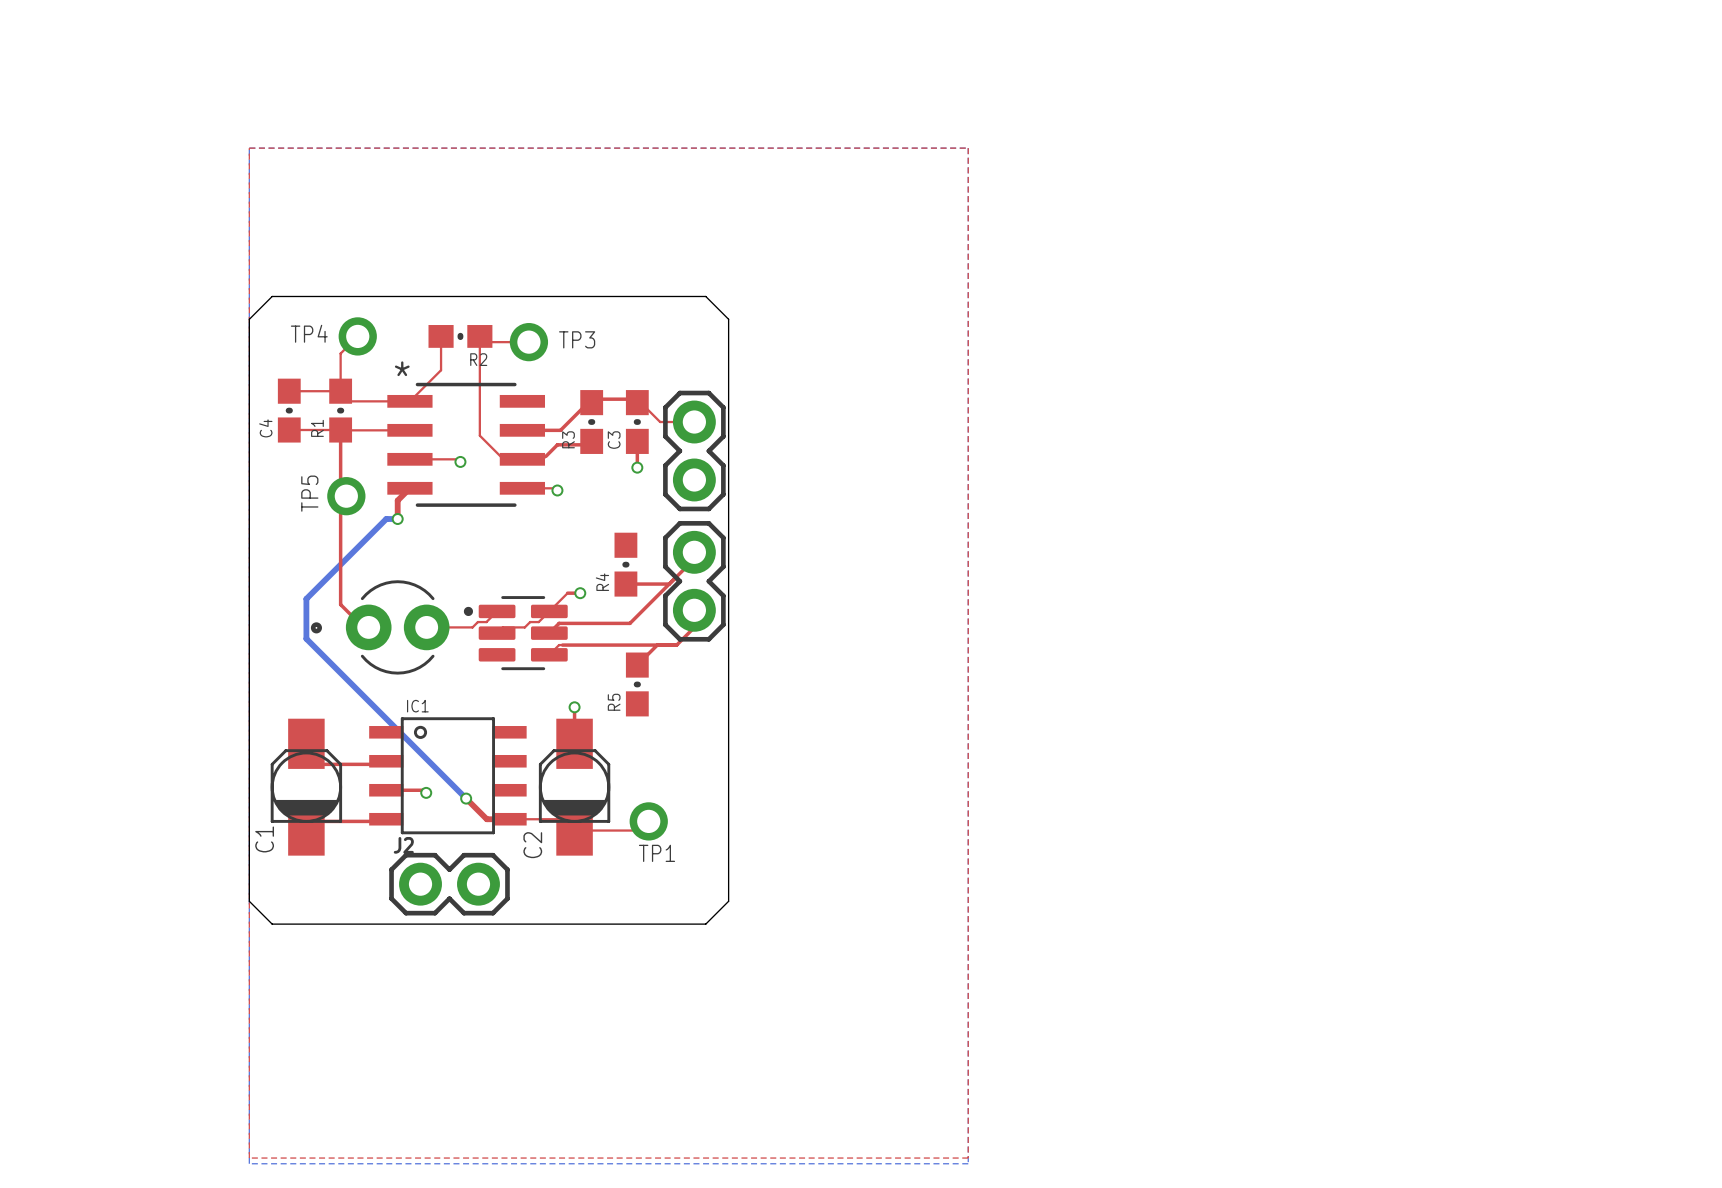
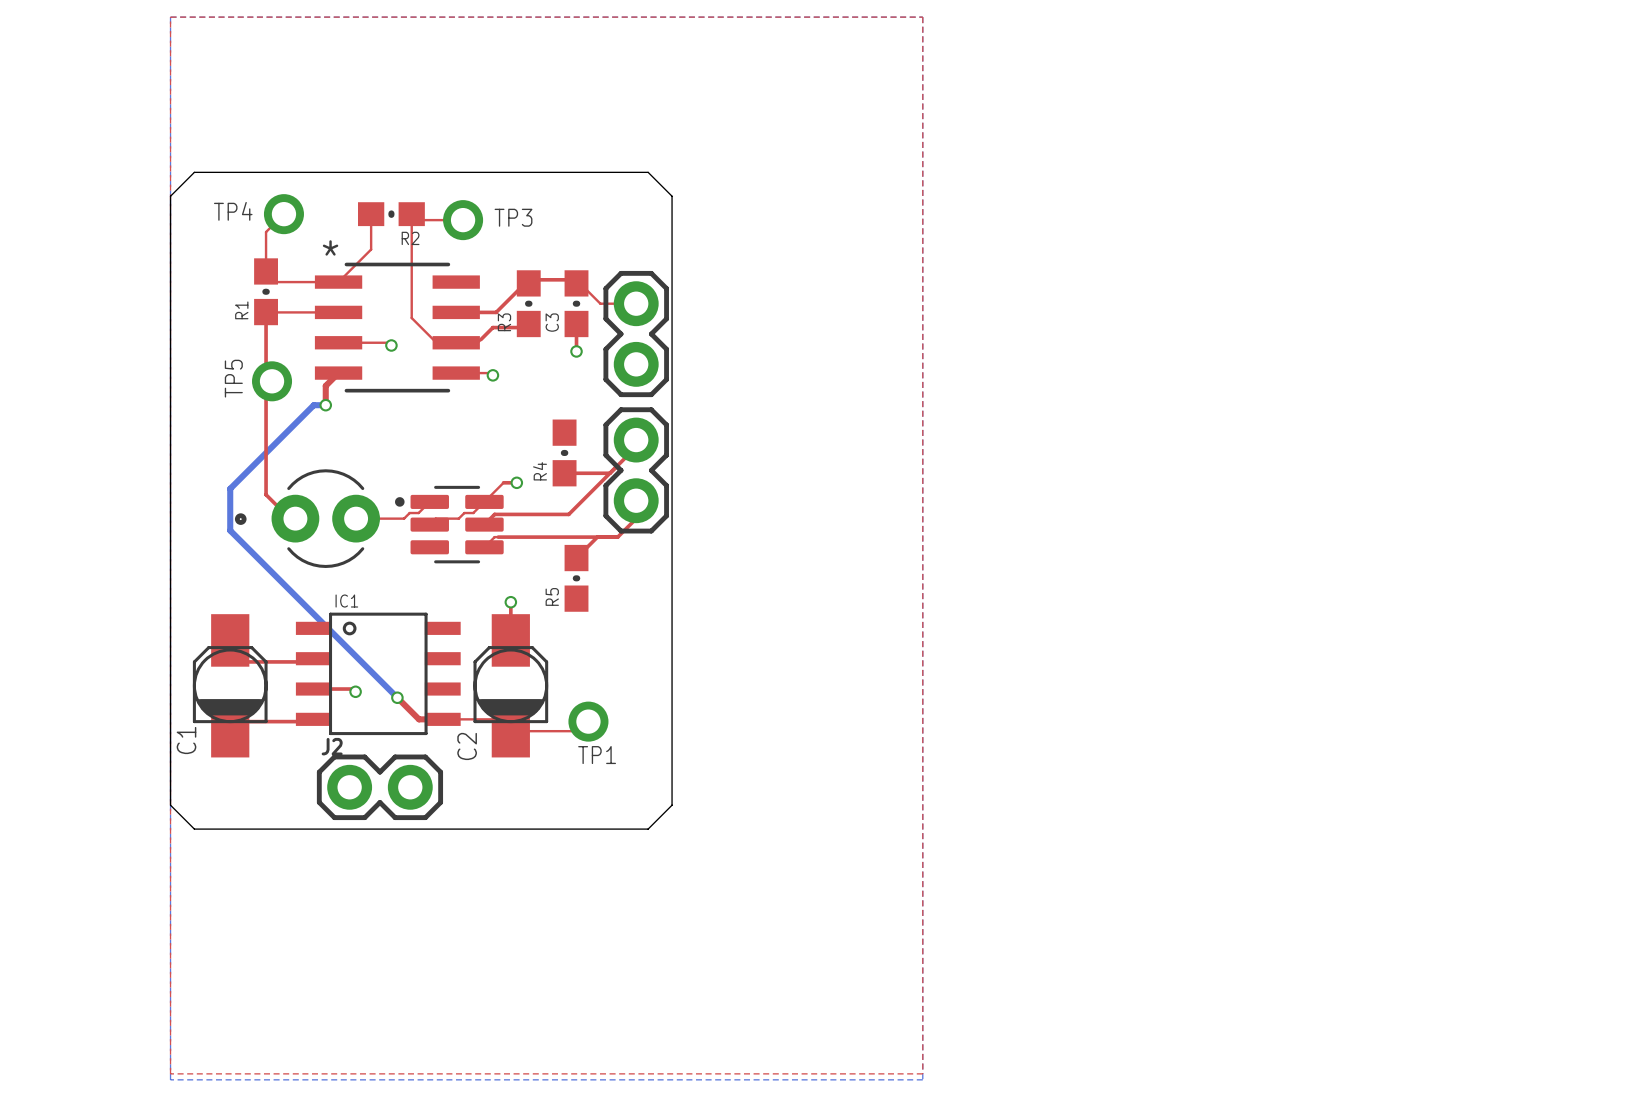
top track: (289, 391) (340, 391) -> none
C4: (289, 410) -> none
top track: (289, 430) (337, 430) (340, 433) -> none

